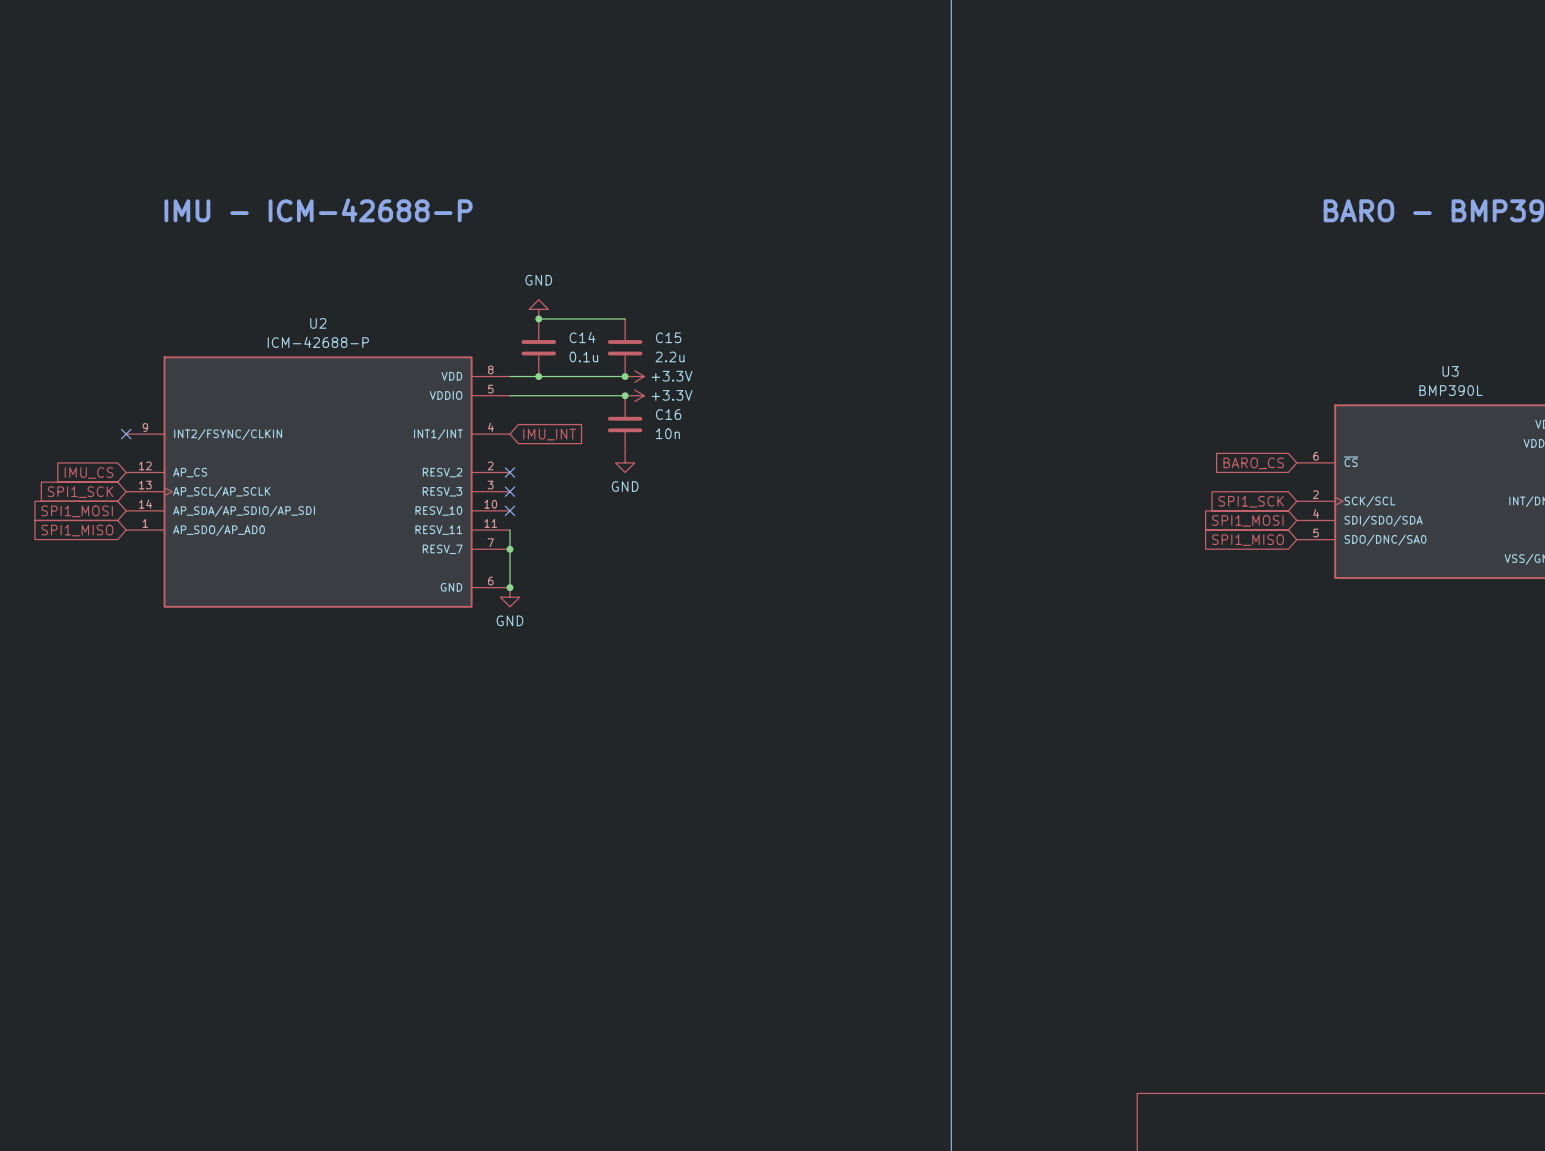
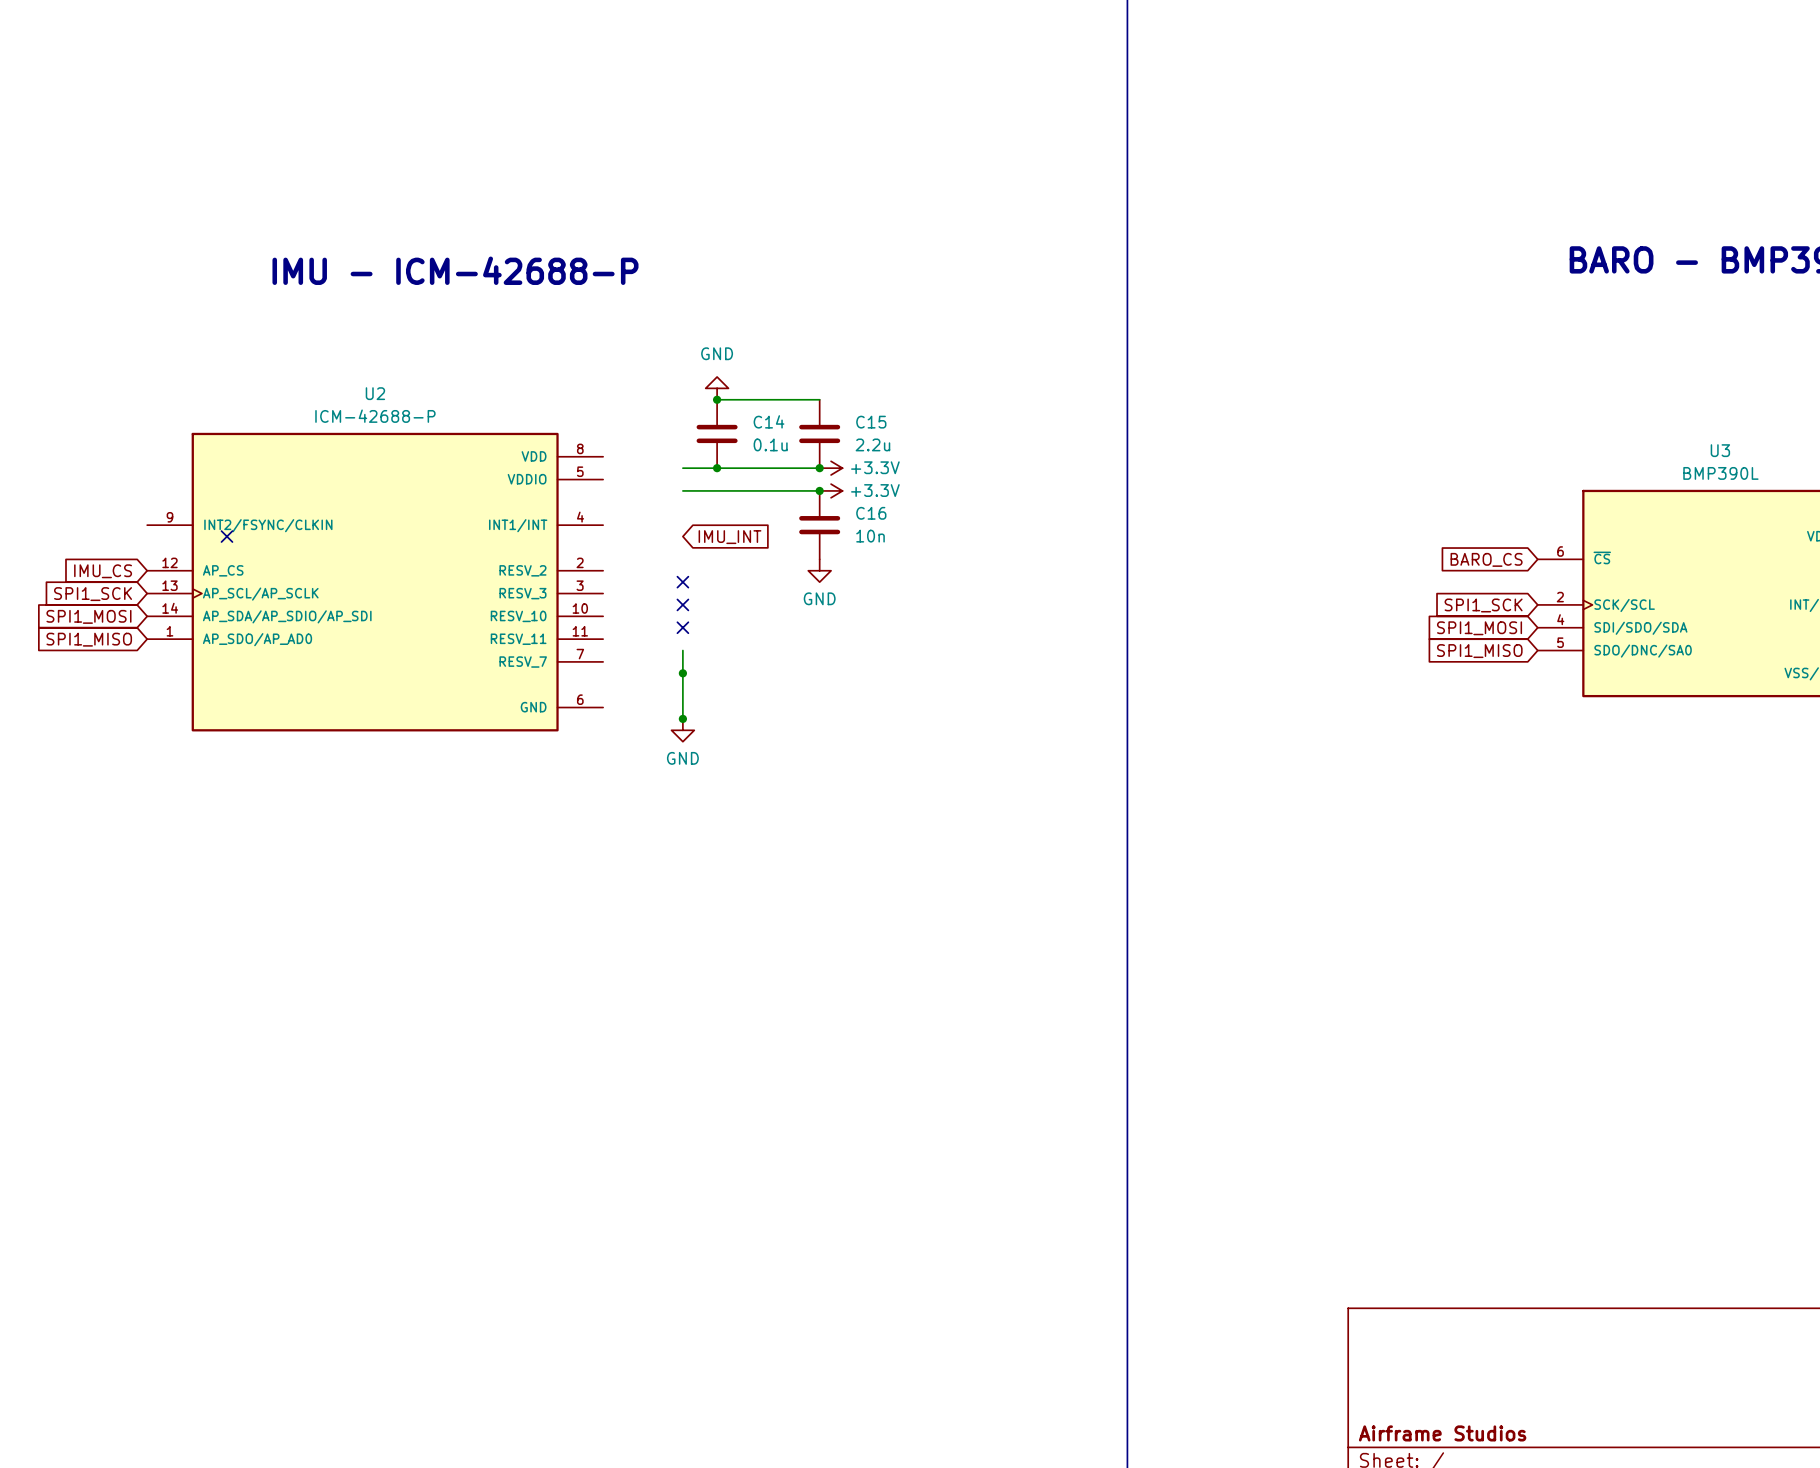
text position: IMU - ICM-42688-P (318, 210) -> IMU - ICM-42688-P (455, 270)
power symbol position: GND (538, 309) -> GND (717, 388)
wire: (538, 318) (625, 318) -> (717, 399) (819, 399)
junction: (538, 318) -> none
junction: none -> (717, 399)
C14 position: (538, 347) -> (717, 433)
C15 position: (625, 347) -> (819, 433)
wire: (509, 376) (625, 376) -> (682, 468) (819, 468)
junction: (538, 376) -> none
junction: (625, 376) -> none
power symbol: +3.3V (634, 376) -> none
junction: none -> (717, 468)
junction: none -> (819, 468)
power symbol: none -> +3.3V (831, 468)
wire: (509, 395) (625, 395) -> (682, 490) (819, 490)
junction: (625, 395) -> none
power symbol: +3.3V (634, 395) -> none
junction: none -> (819, 490)
power symbol: none -> +3.3V (831, 490)
C16 position: (625, 424) -> (819, 525)
no-connect mark: (126, 434) -> none
global label position: IMU_INT (549, 434) -> IMU_INT (730, 537)
no-connect mark: none -> (226, 536)
power symbol position: GND (625, 462) -> GND (819, 570)
no-connect mark: (509, 472) -> none
no-connect mark: none -> (682, 582)
no-connect mark: (509, 491) -> none
no-connect mark: none -> (682, 604)
no-connect mark: (509, 510) -> none
no-connect mark: none -> (682, 627)
wire: (509, 530) (509, 587) -> (682, 650) (682, 718)
junction: (509, 549) -> none
junction: none -> (682, 673)
junction: (509, 587) -> none
power symbol position: GND (509, 597) -> GND (682, 730)
junction: none -> (682, 718)

